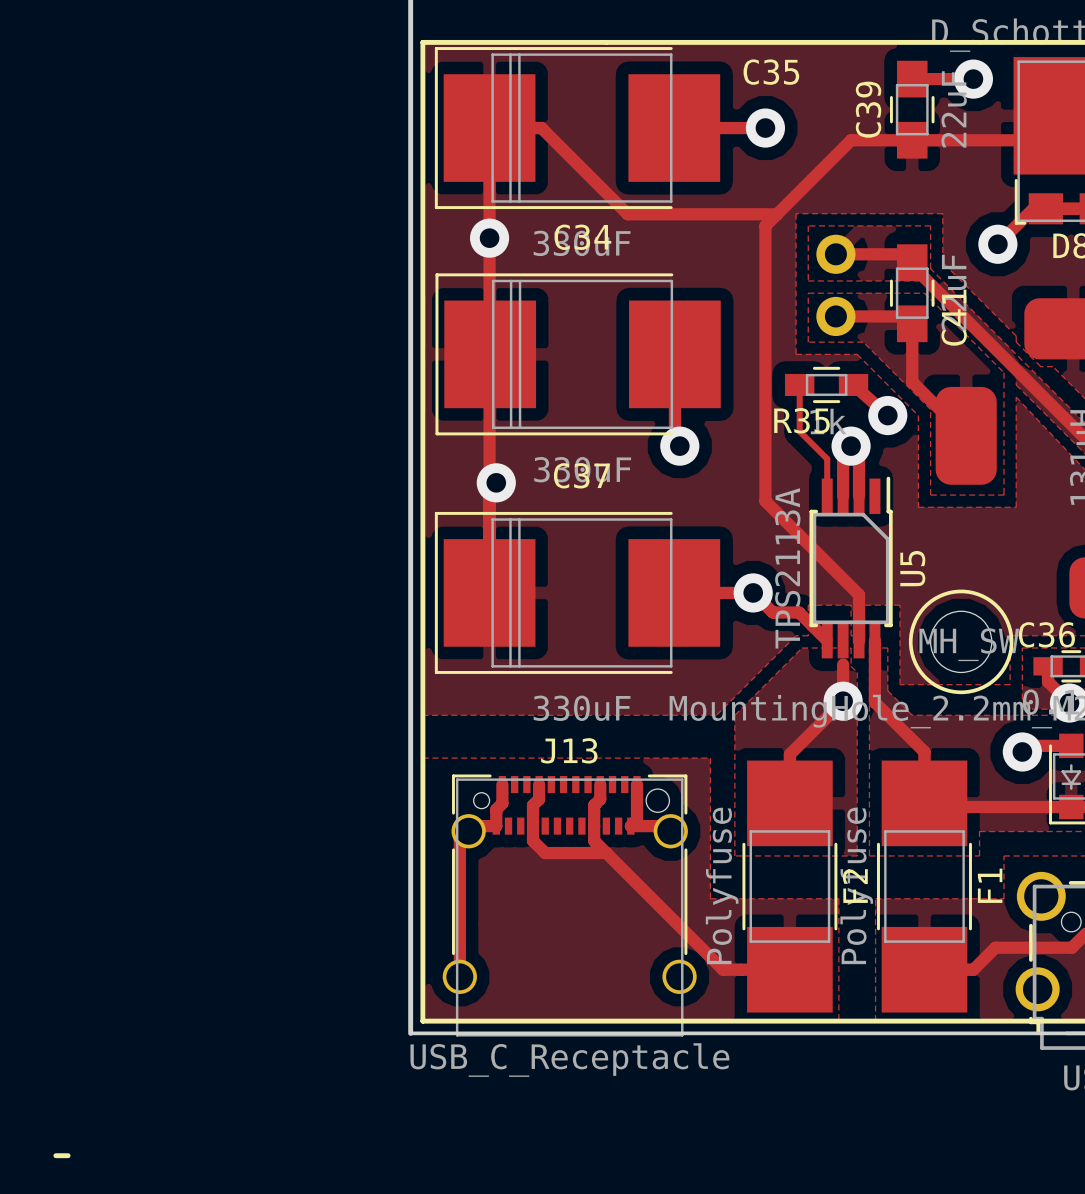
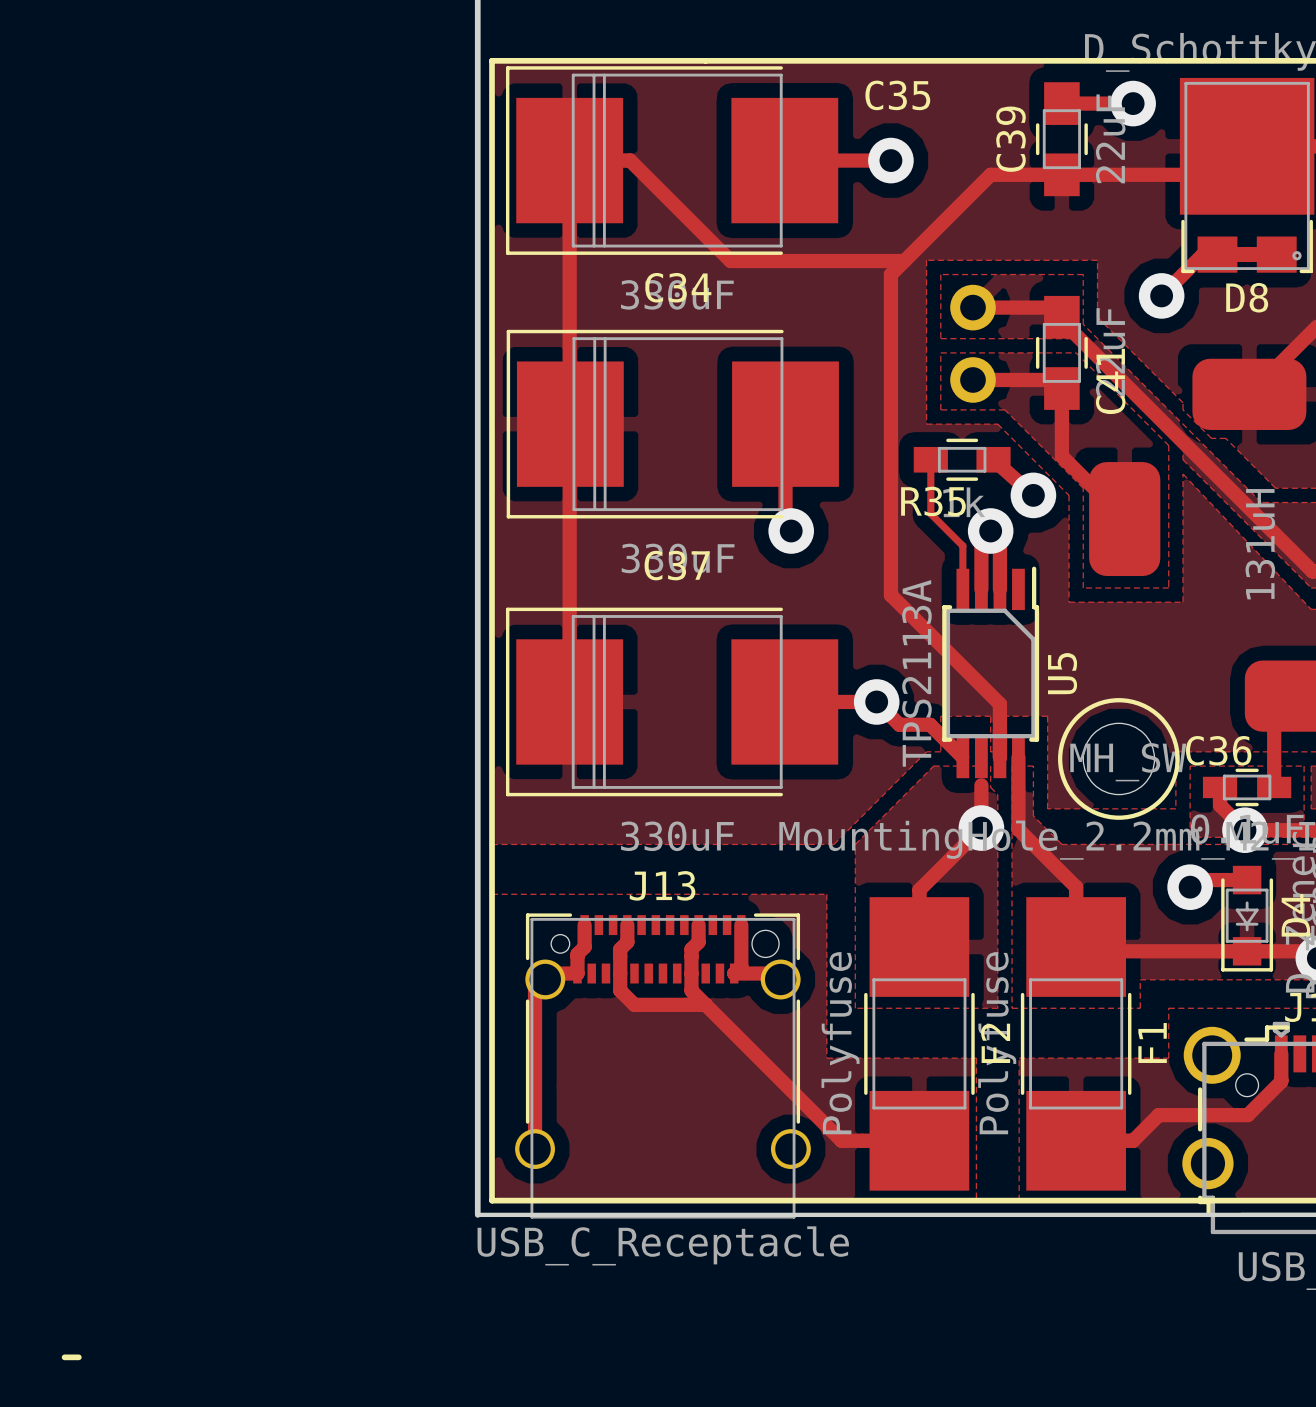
via: (489, 238) -> none
via: (496, 482) -> none

